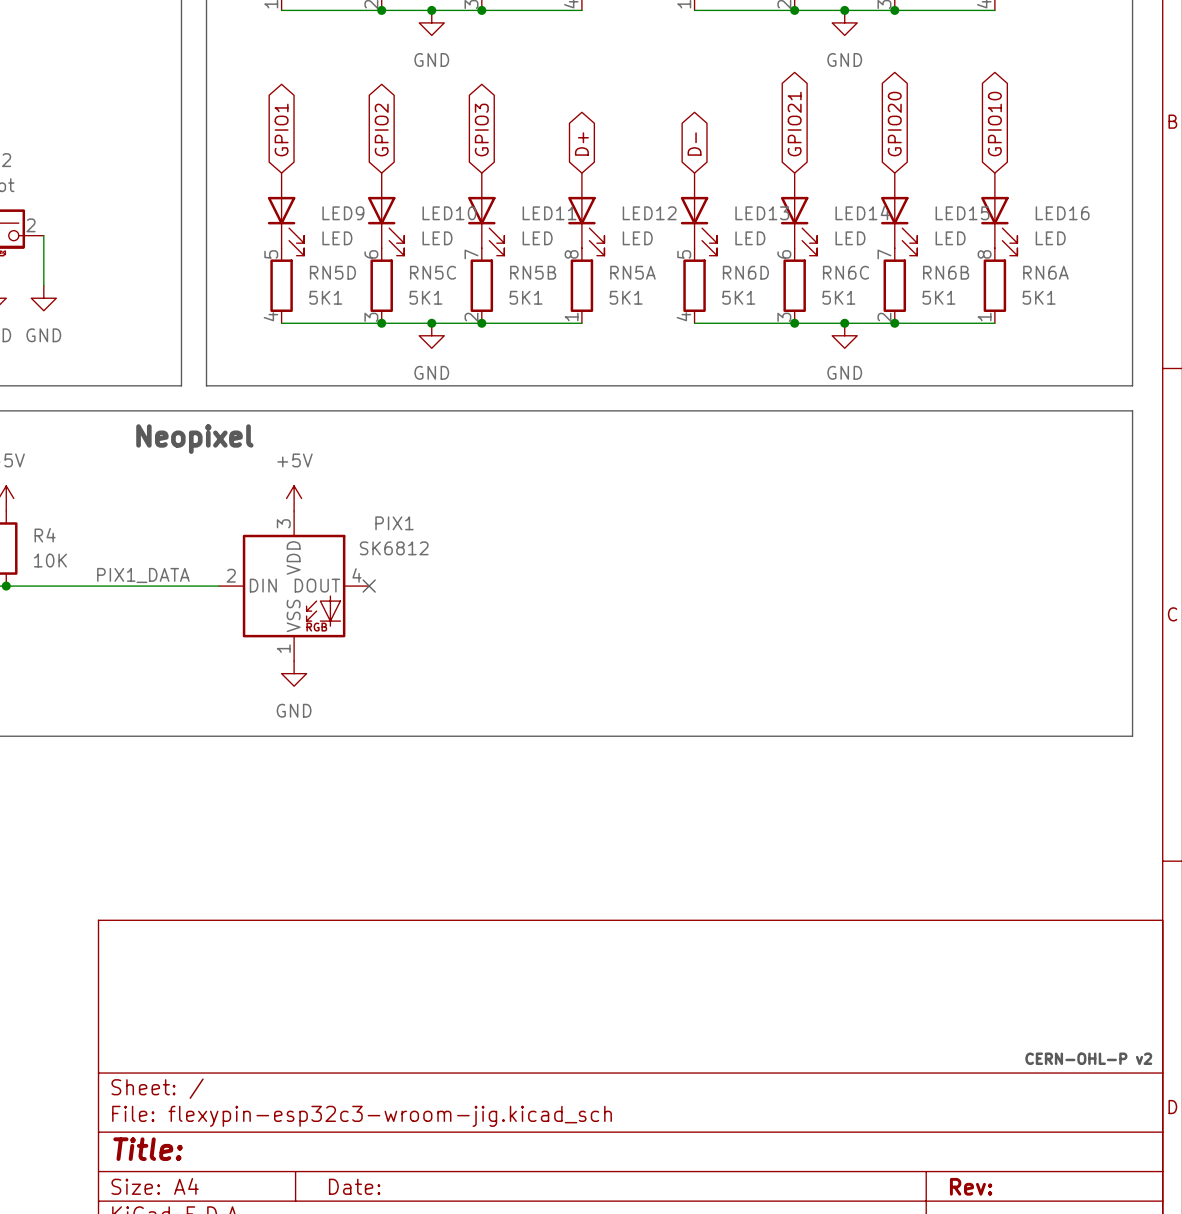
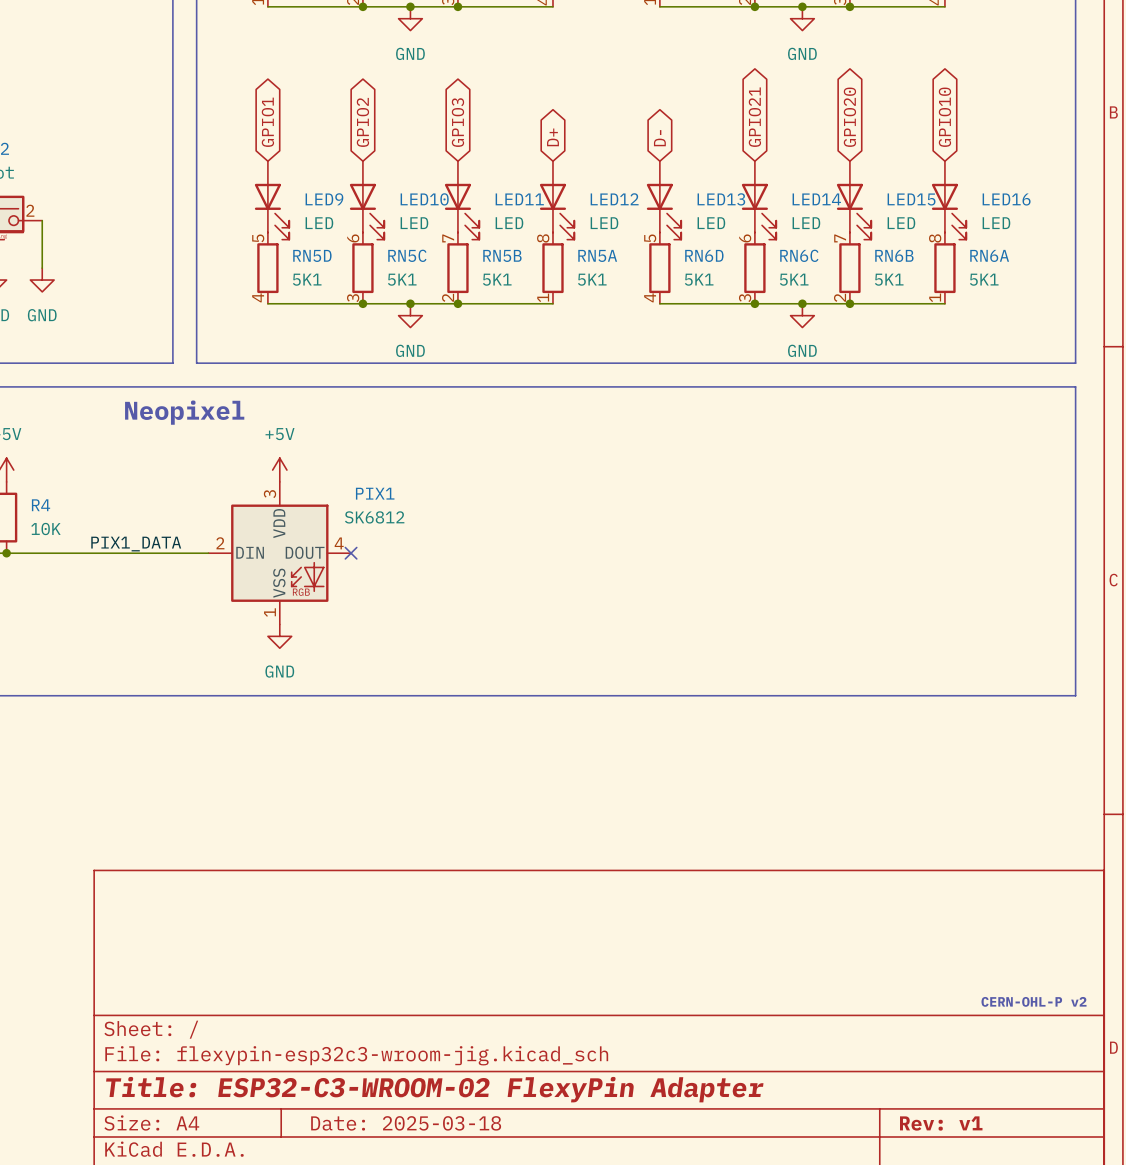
title block: Title: (148, 1149) -> Title: ESP32-C3-WROOM-02 FlexyPin Adapter (434, 1089)
title block: Date: (354, 1186) -> Date: 2025-03-18 (406, 1123)
title block: Rev: (971, 1186) -> Rev: v1 (941, 1123)

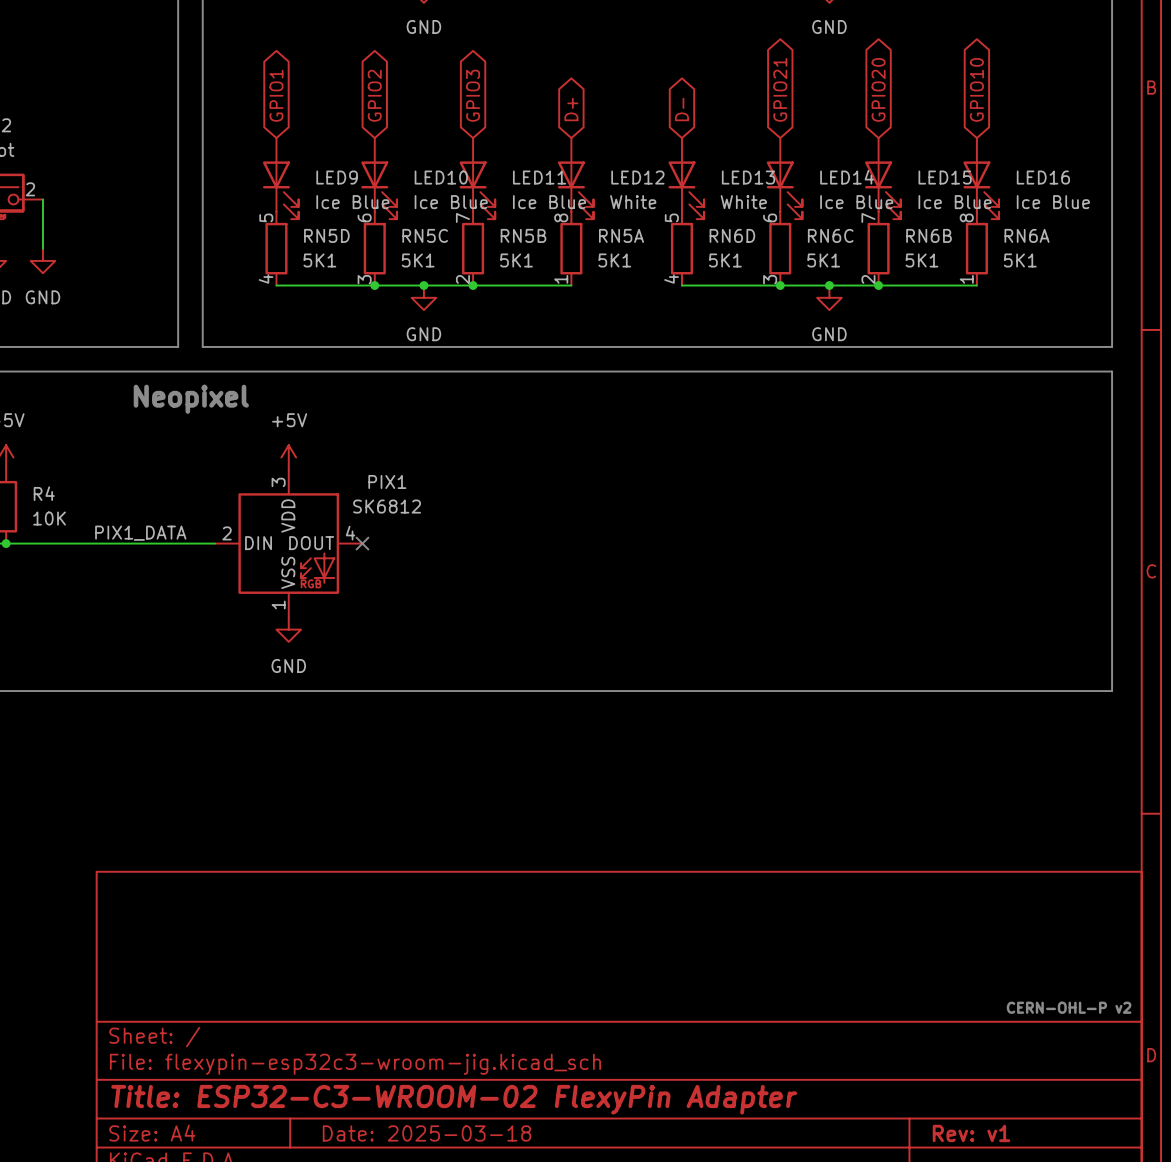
LED9 value: LED (319, 223) -> Ice Blue (352, 202)
LED10 value: LED (414, 223) -> Ice Blue (451, 202)
LED11 value: LED (509, 223) -> Ice Blue (549, 202)
LED12 value: LED (604, 223) -> White (633, 202)
LED13 value: LED (711, 223) -> White (743, 202)
LED14 value: LED (806, 223) -> Ice Blue (856, 202)
LED15 value: LED (901, 223) -> Ice Blue (955, 202)
LED16 value: LED (996, 223) -> Ice Blue (1053, 202)

